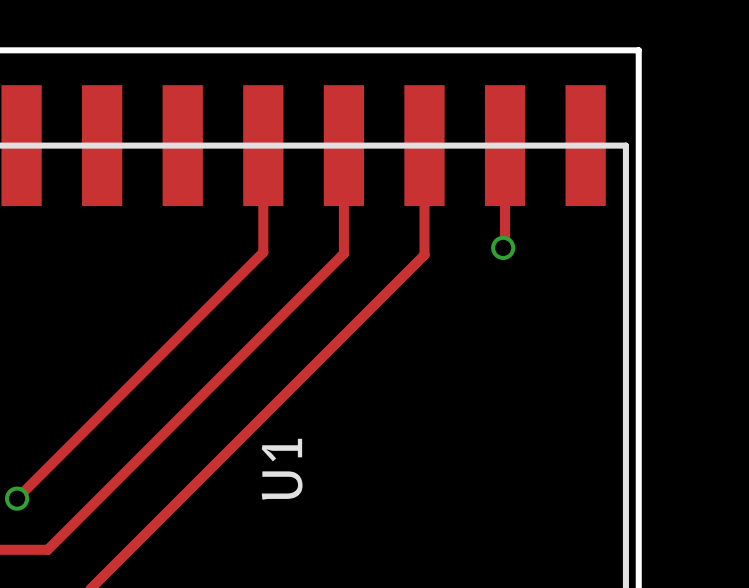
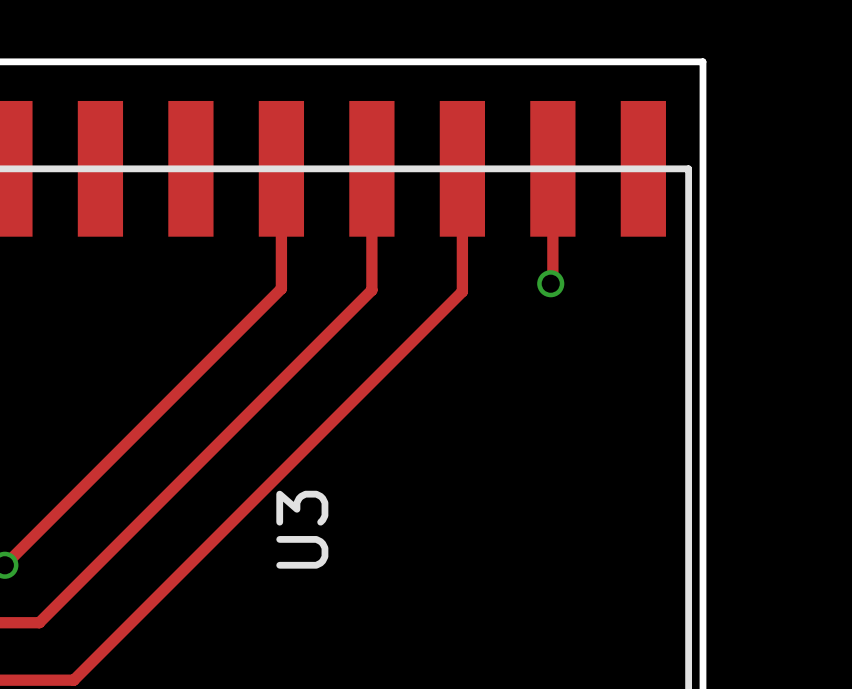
U1 name: U1 (282, 469) -> U3 (302, 529)

